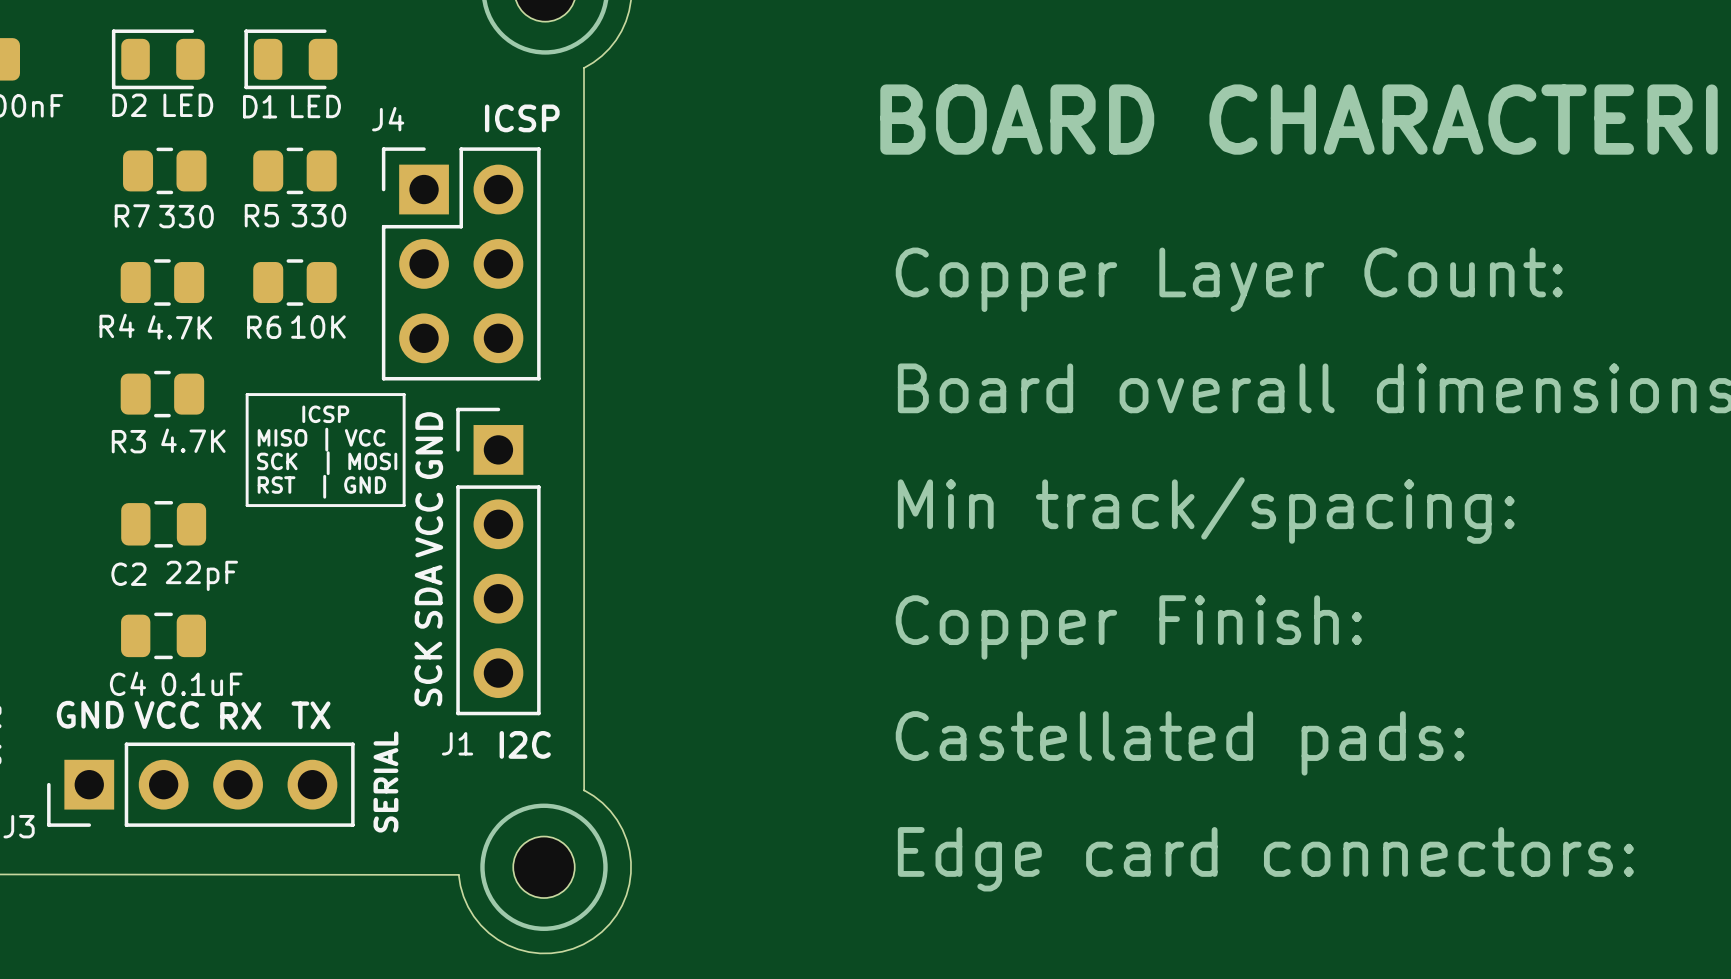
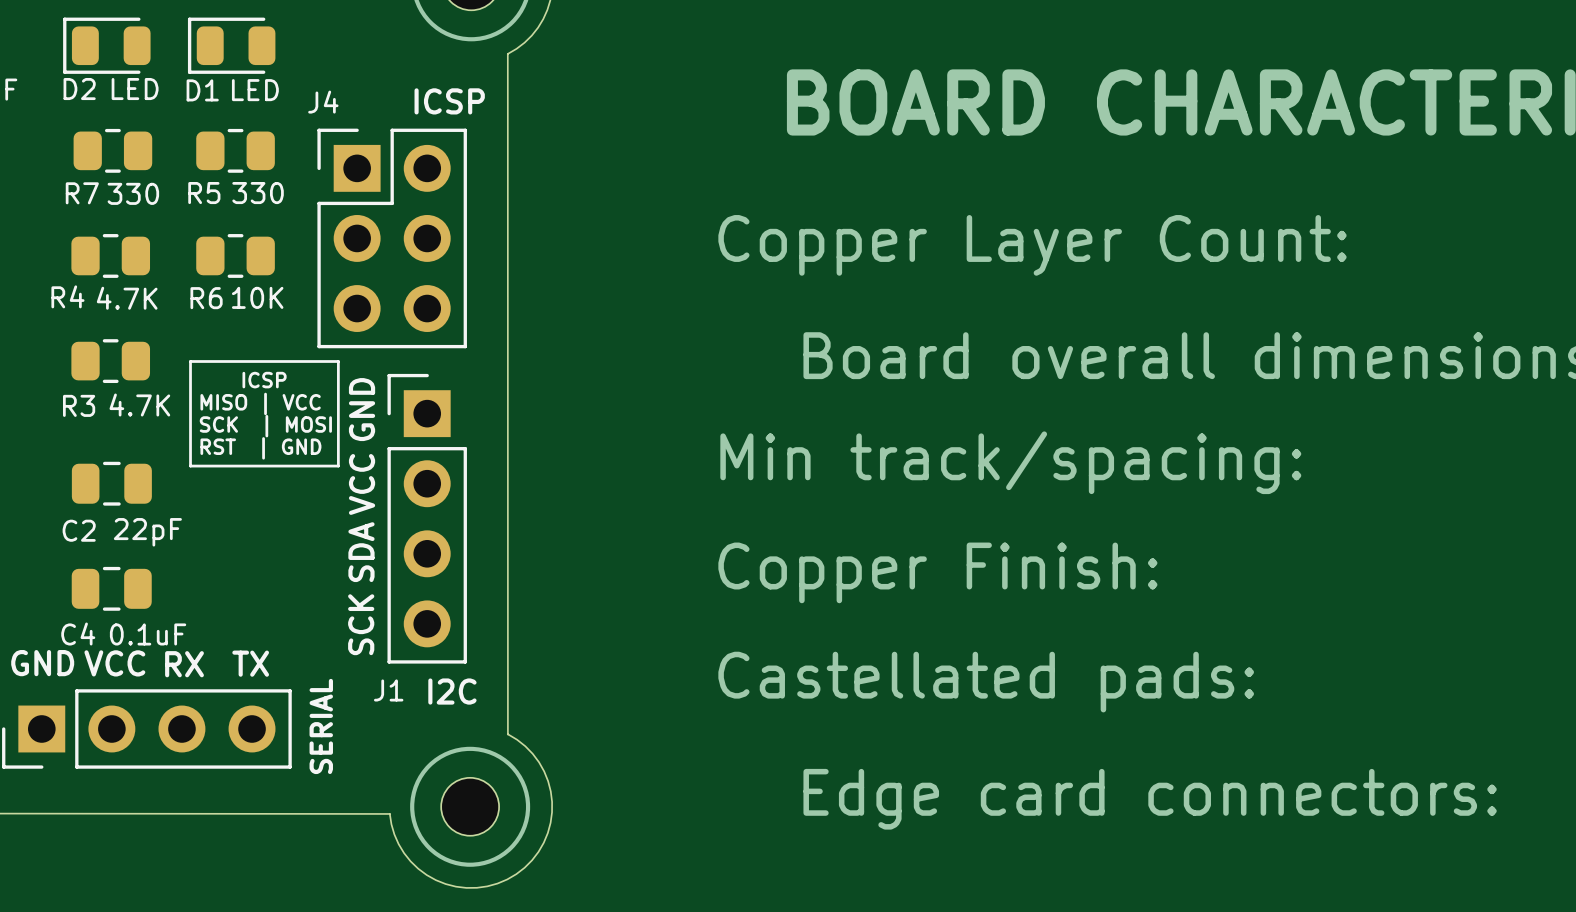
text position: Copper Layer Count: (1229, 279) -> Copper Layer Count: (1032, 245)
text position: Min track/spacing: (1206, 510) -> Min track/spacing: (1010, 462)
text position: Copper Finish: (1128, 627) -> Copper Finish: (937, 572)
text position: Castellated pads: (1180, 743) -> Castellated pads: (986, 682)

